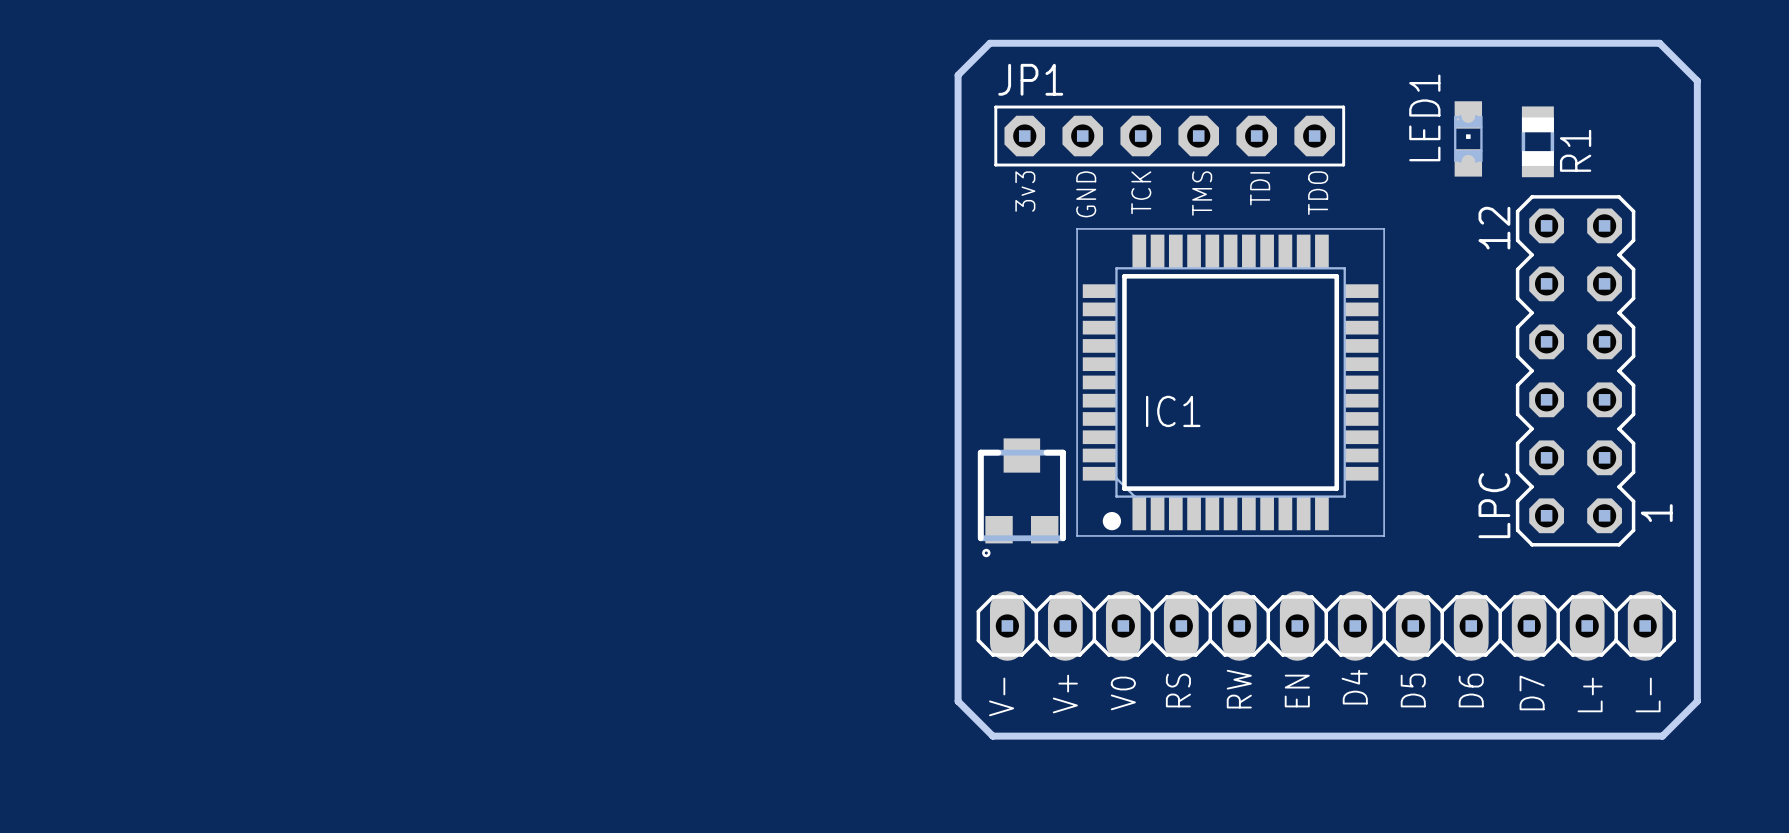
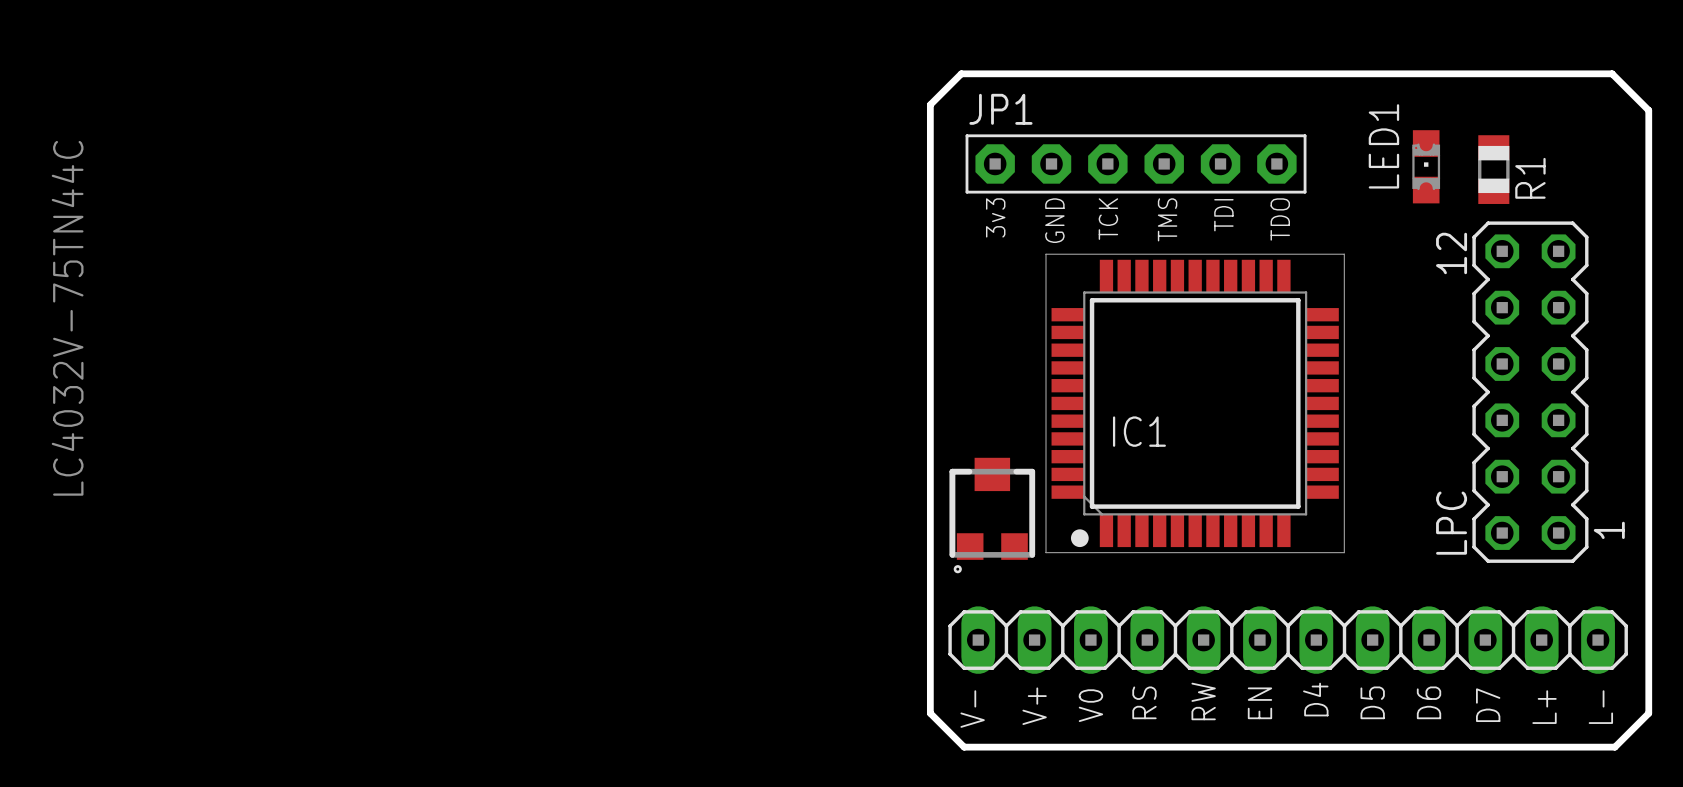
IC1 value: none -> LC4032V-75TN44C (67, 318)

